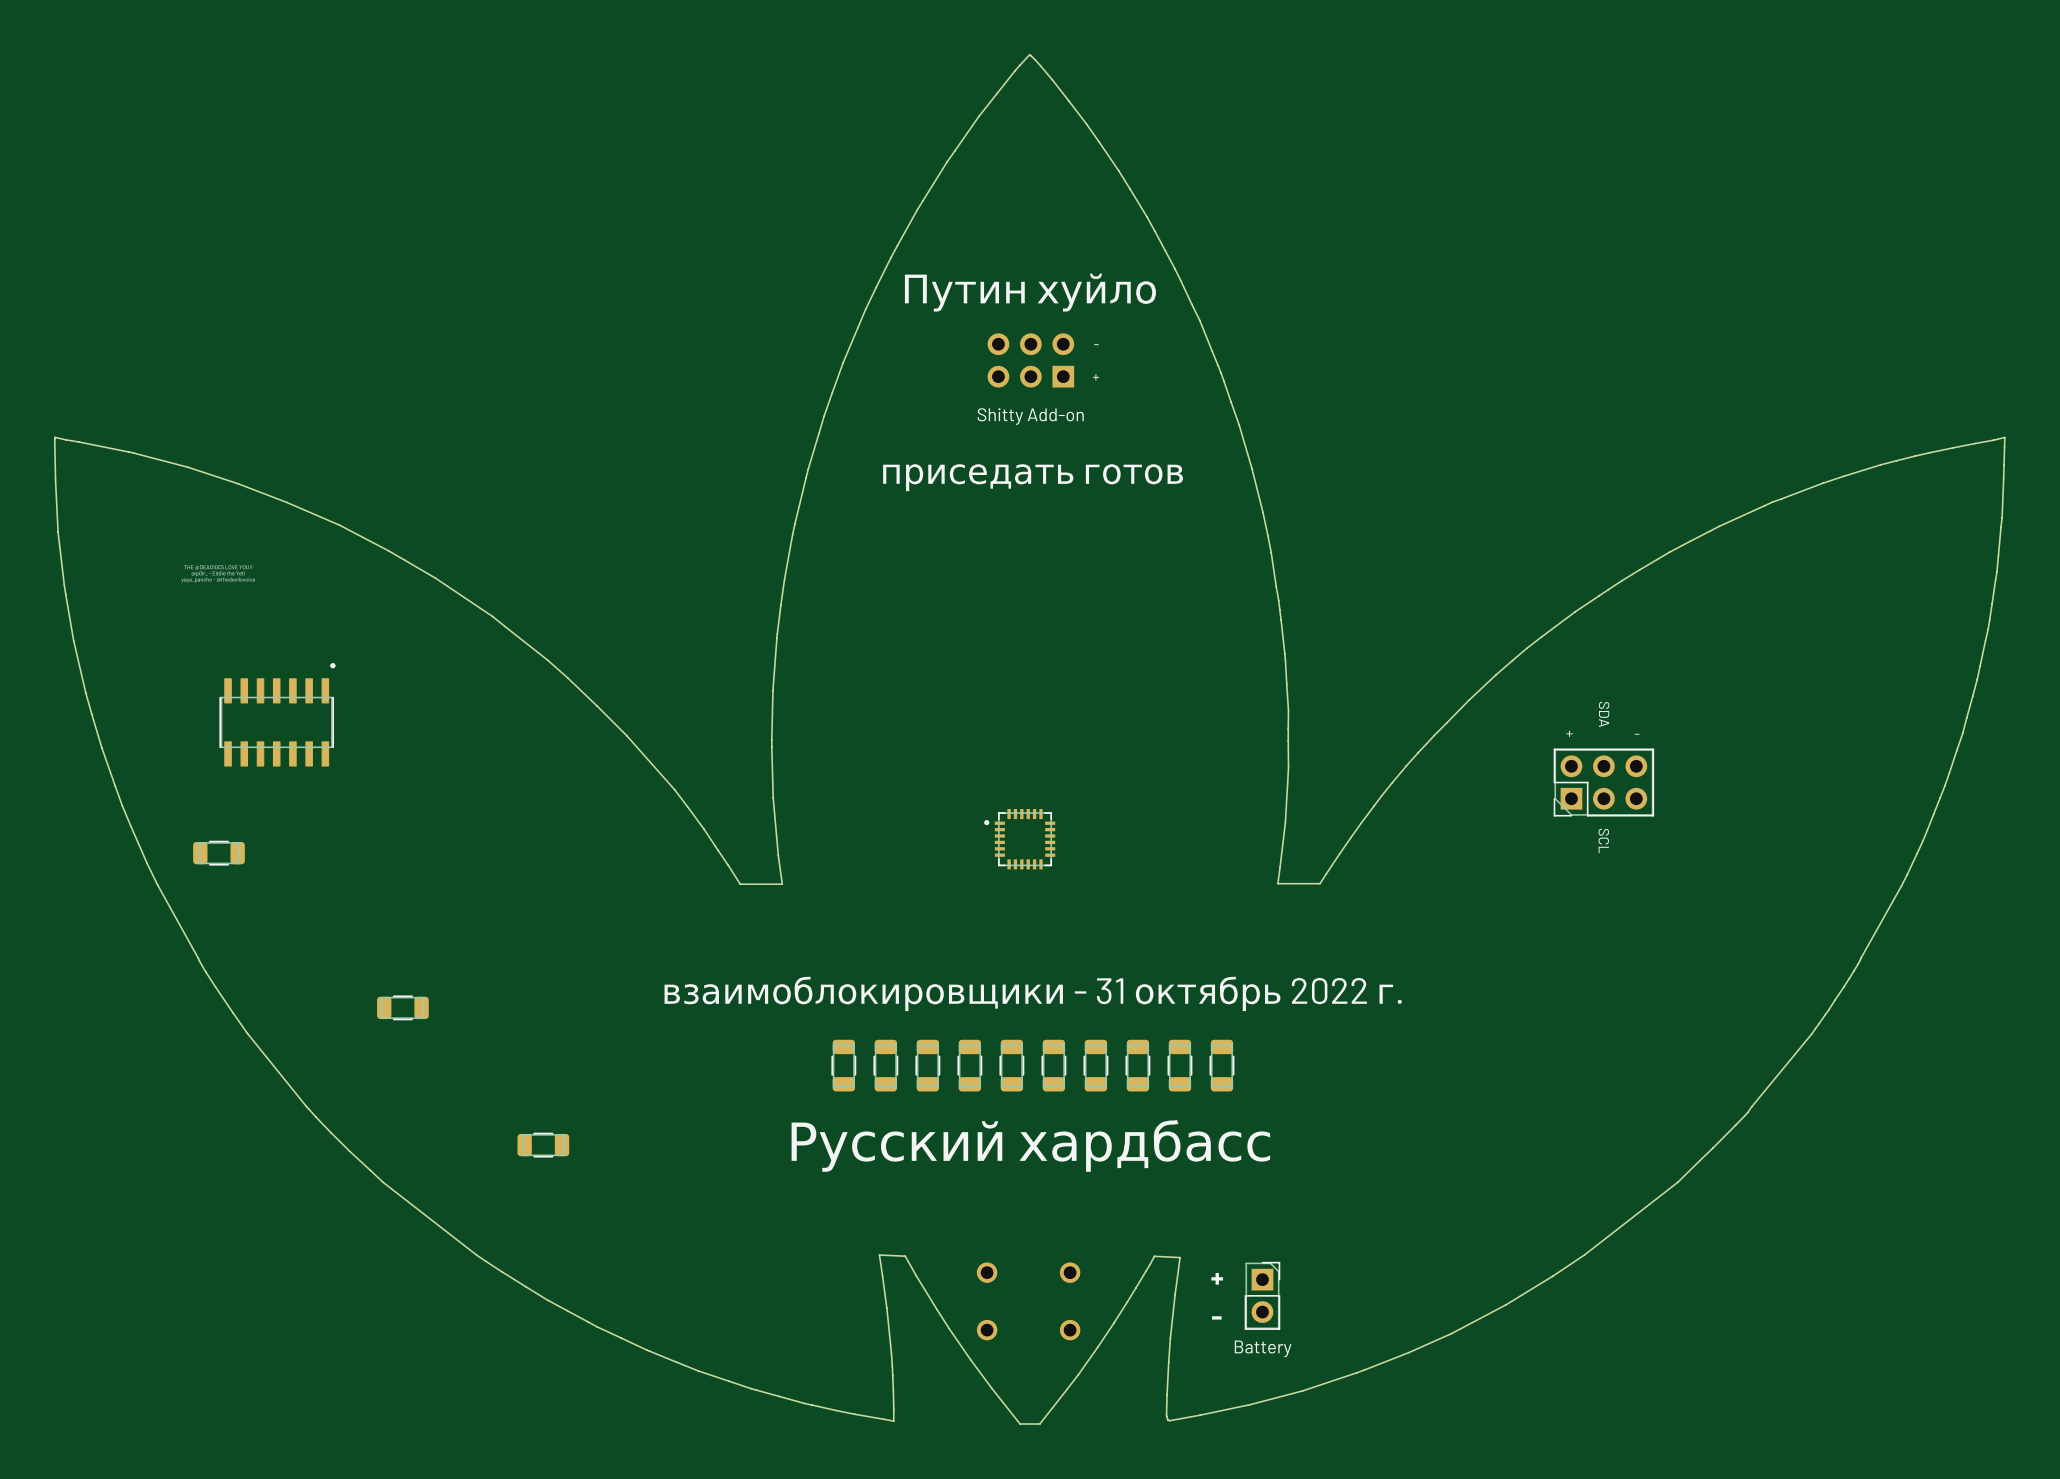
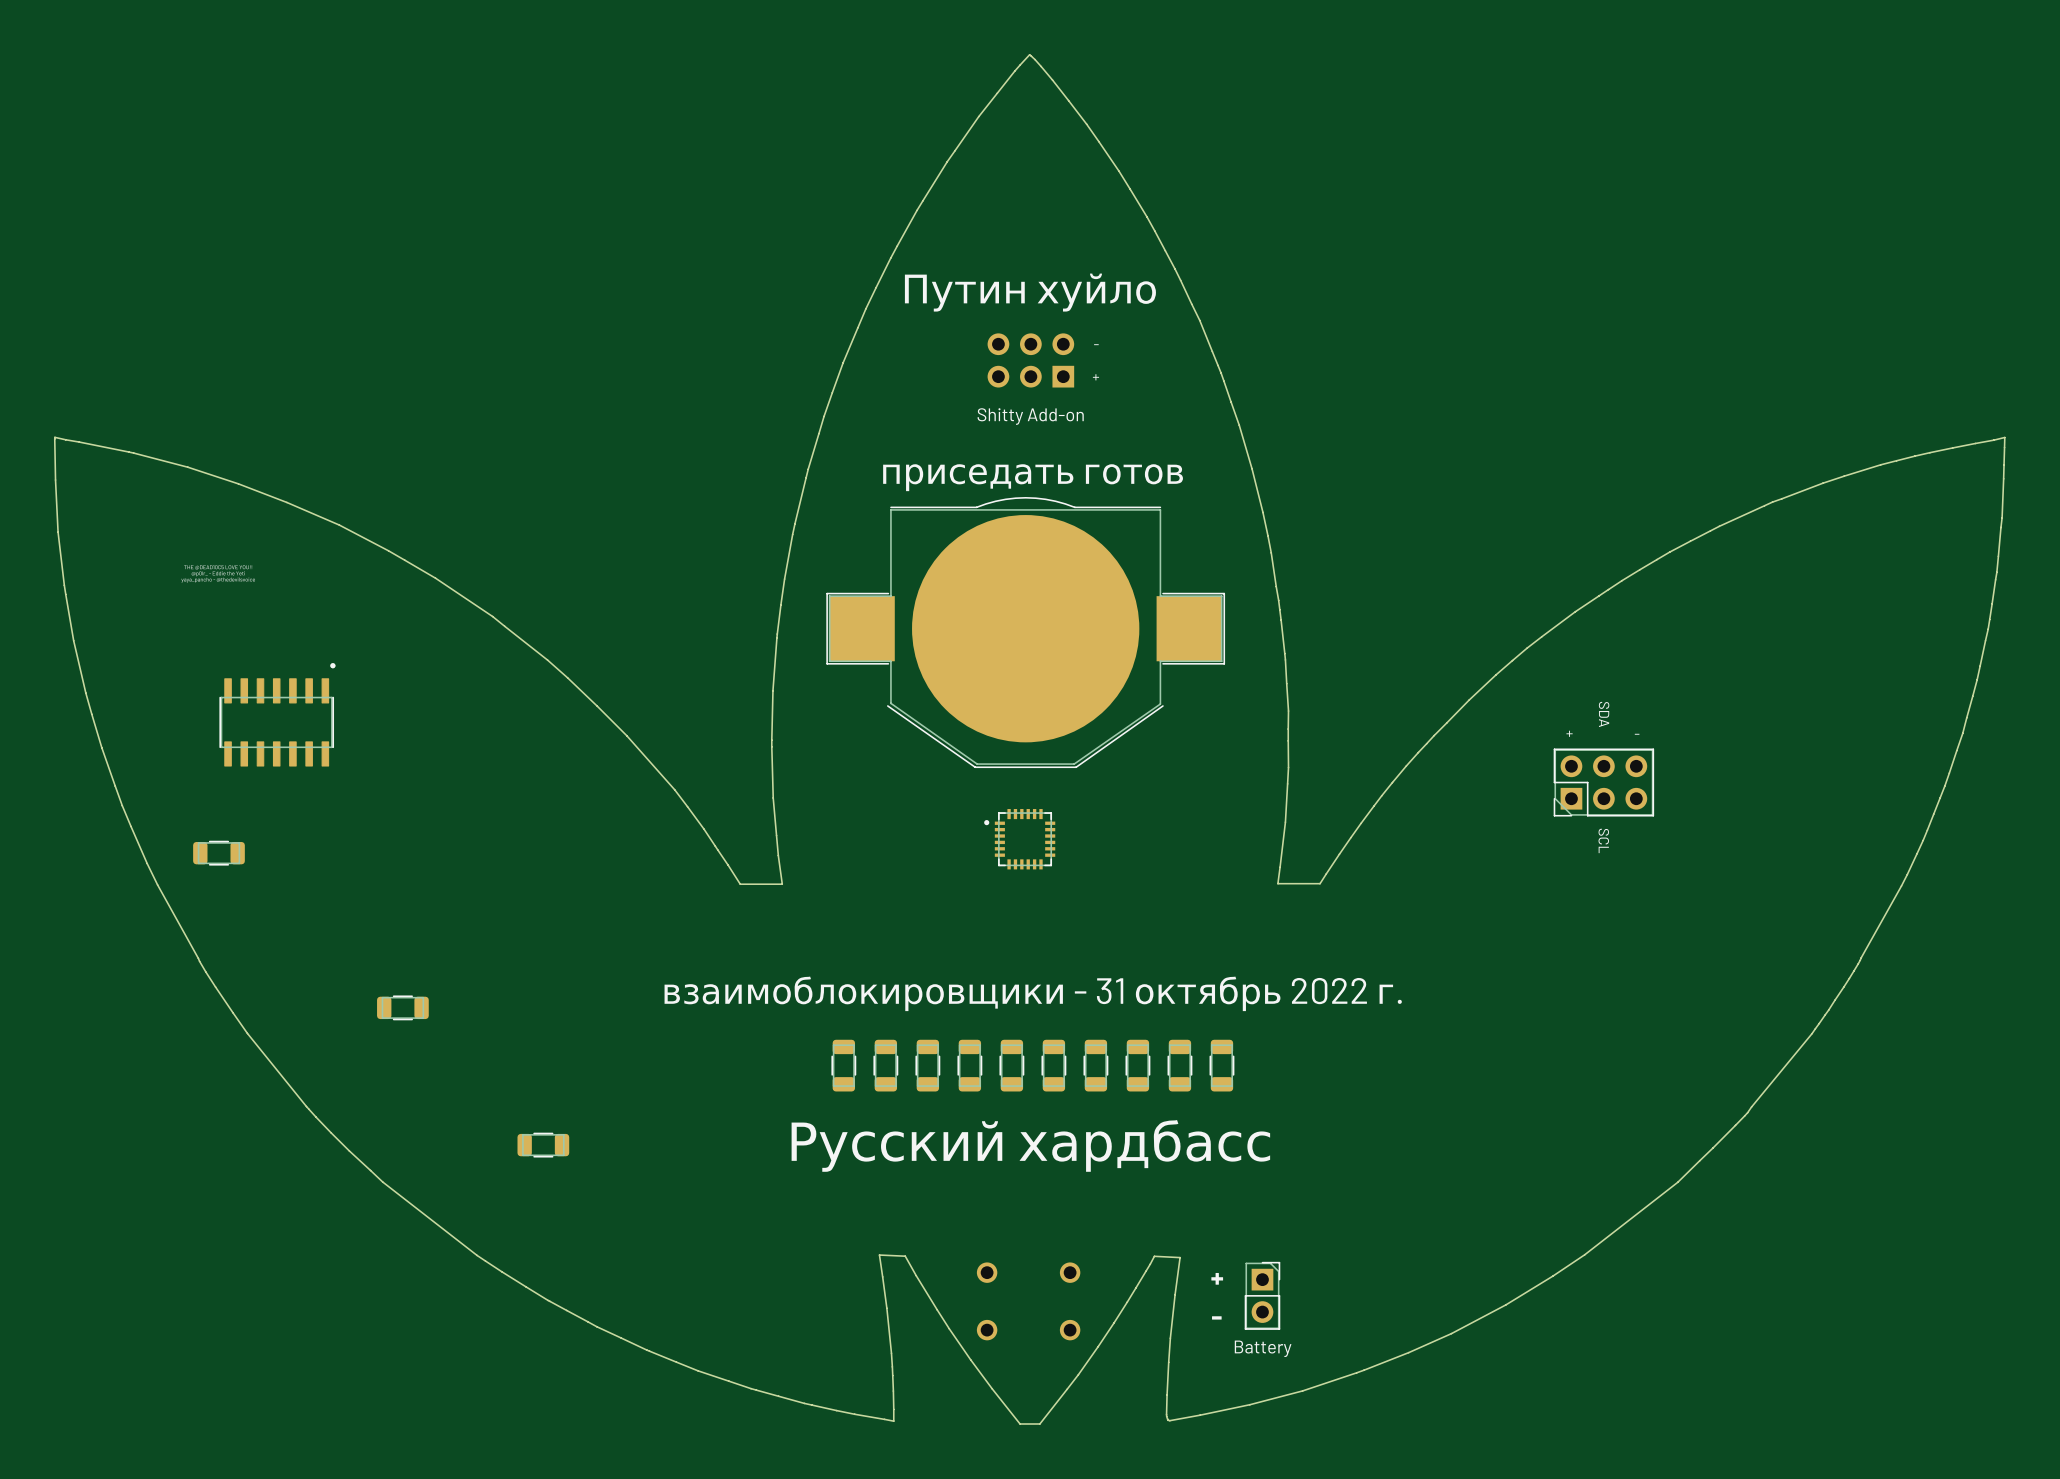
part: none -> (1025, 632)

